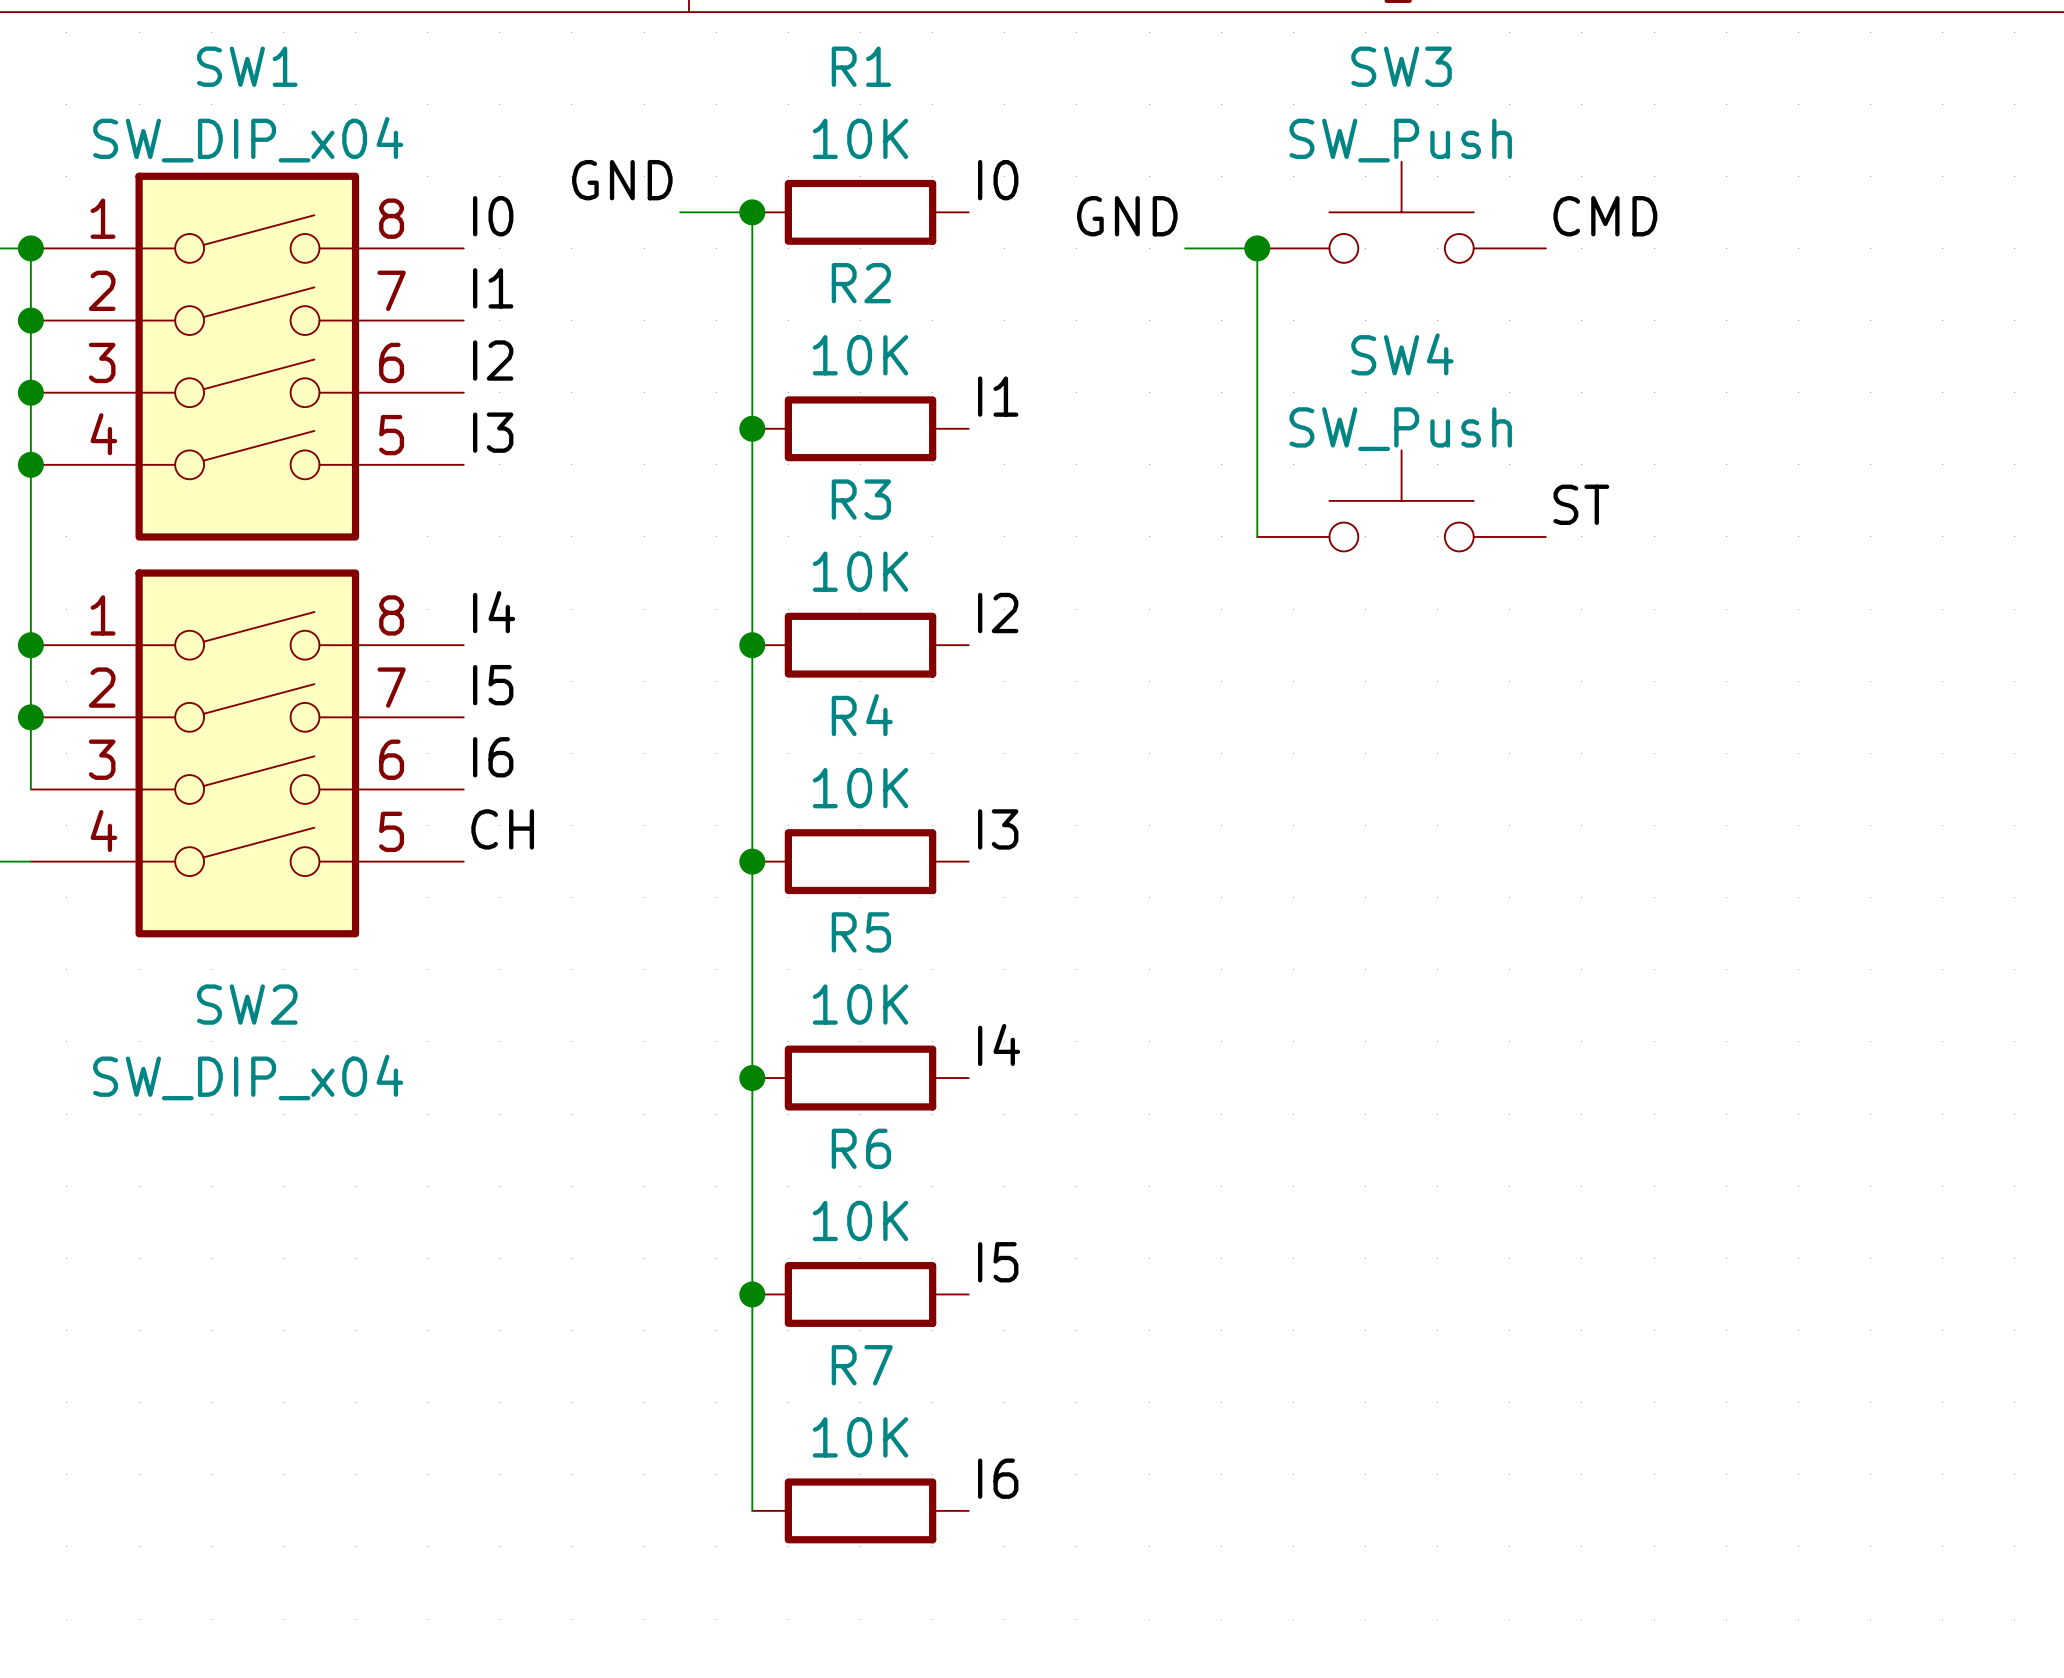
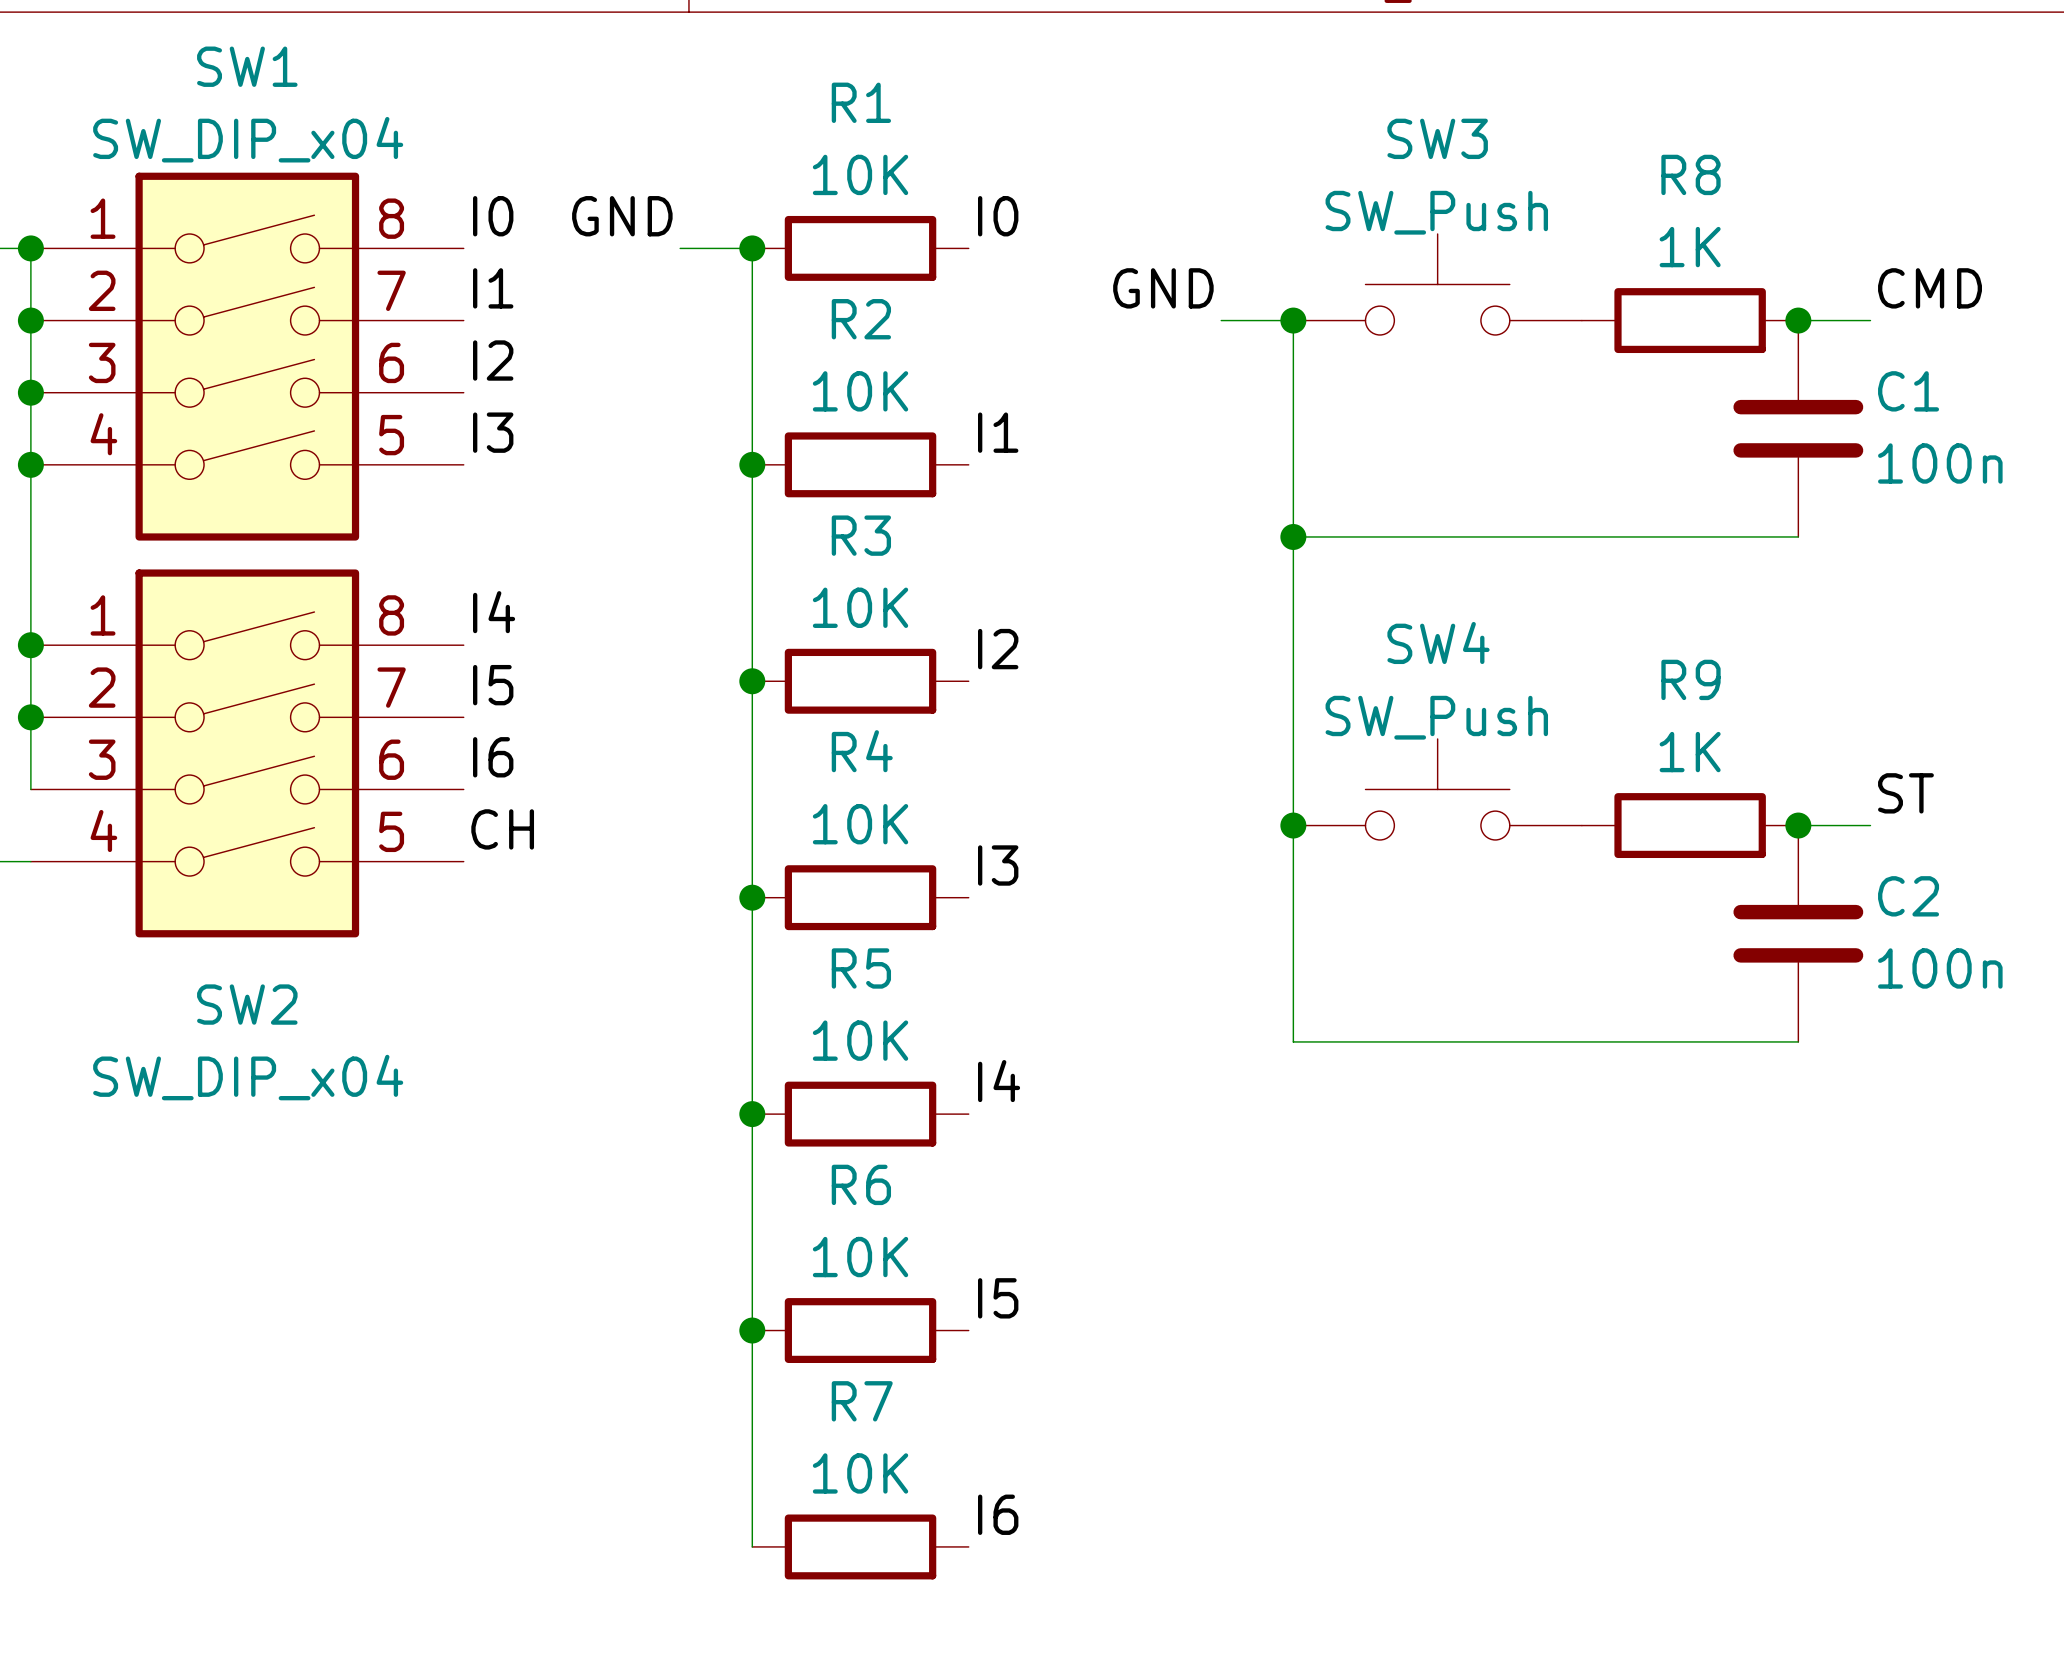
label position: GND (622, 180) -> GND (622, 216)
label position: I0 (998, 180) -> I0 (998, 216)
wire: (680, 212) (752, 212) (752, 248) -> (680, 248) (752, 248)
junction position: (752, 212) -> (752, 248)
R1 position: (860, 212) -> (860, 248)
SW3 position: (1401, 212) -> (1437, 284)
label position: GND (1127, 216) -> GND (1163, 288)
label position: CMD (1605, 216) -> CMD (1930, 288)
wire: (1185, 248) (1257, 248) (1257, 536) -> none
junction position: (1257, 248) -> (1293, 320)
wire: none -> (1221, 320) (1293, 320) (1293, 1041) (1798, 1041)
R8: none -> 1K (1690, 320)
wire: none -> (1798, 320) (1870, 320)
junction: none -> (1798, 320)
label position: I1 (998, 396) -> I1 (998, 432)
junction position: (752, 428) -> (752, 464)
R2 position: (860, 428) -> (860, 464)
C1: none -> 100n (1798, 428)
SW4 position: (1401, 500) -> (1437, 789)
label position: ST (1581, 504) -> ST (1905, 793)
wire: none -> (1293, 536) (1798, 536)
junction: none -> (1293, 536)
label position: I2 (998, 613) -> I2 (998, 649)
junction position: (752, 645) -> (752, 681)
R3 position: (860, 645) -> (860, 681)
junction: none -> (1293, 825)
R9: none -> 1K (1690, 825)
wire: none -> (1798, 825) (1870, 825)
junction: none -> (1798, 825)
label position: I3 (998, 829) -> I3 (998, 865)
junction position: (752, 861) -> (752, 897)
R4 position: (860, 861) -> (860, 897)
C2: none -> 100n (1798, 933)
label position: I4 (999, 1044) -> I4 (999, 1081)
junction position: (752, 1078) -> (752, 1114)
R5 position: (860, 1078) -> (860, 1114)
label position: I5 (998, 1262) -> I5 (998, 1298)
junction position: (752, 1294) -> (752, 1330)
R6 position: (860, 1294) -> (860, 1330)
label position: I6 (998, 1478) -> I6 (998, 1514)
wire: none -> (752, 1510) (752, 1546)
R7 position: (860, 1510) -> (860, 1546)

